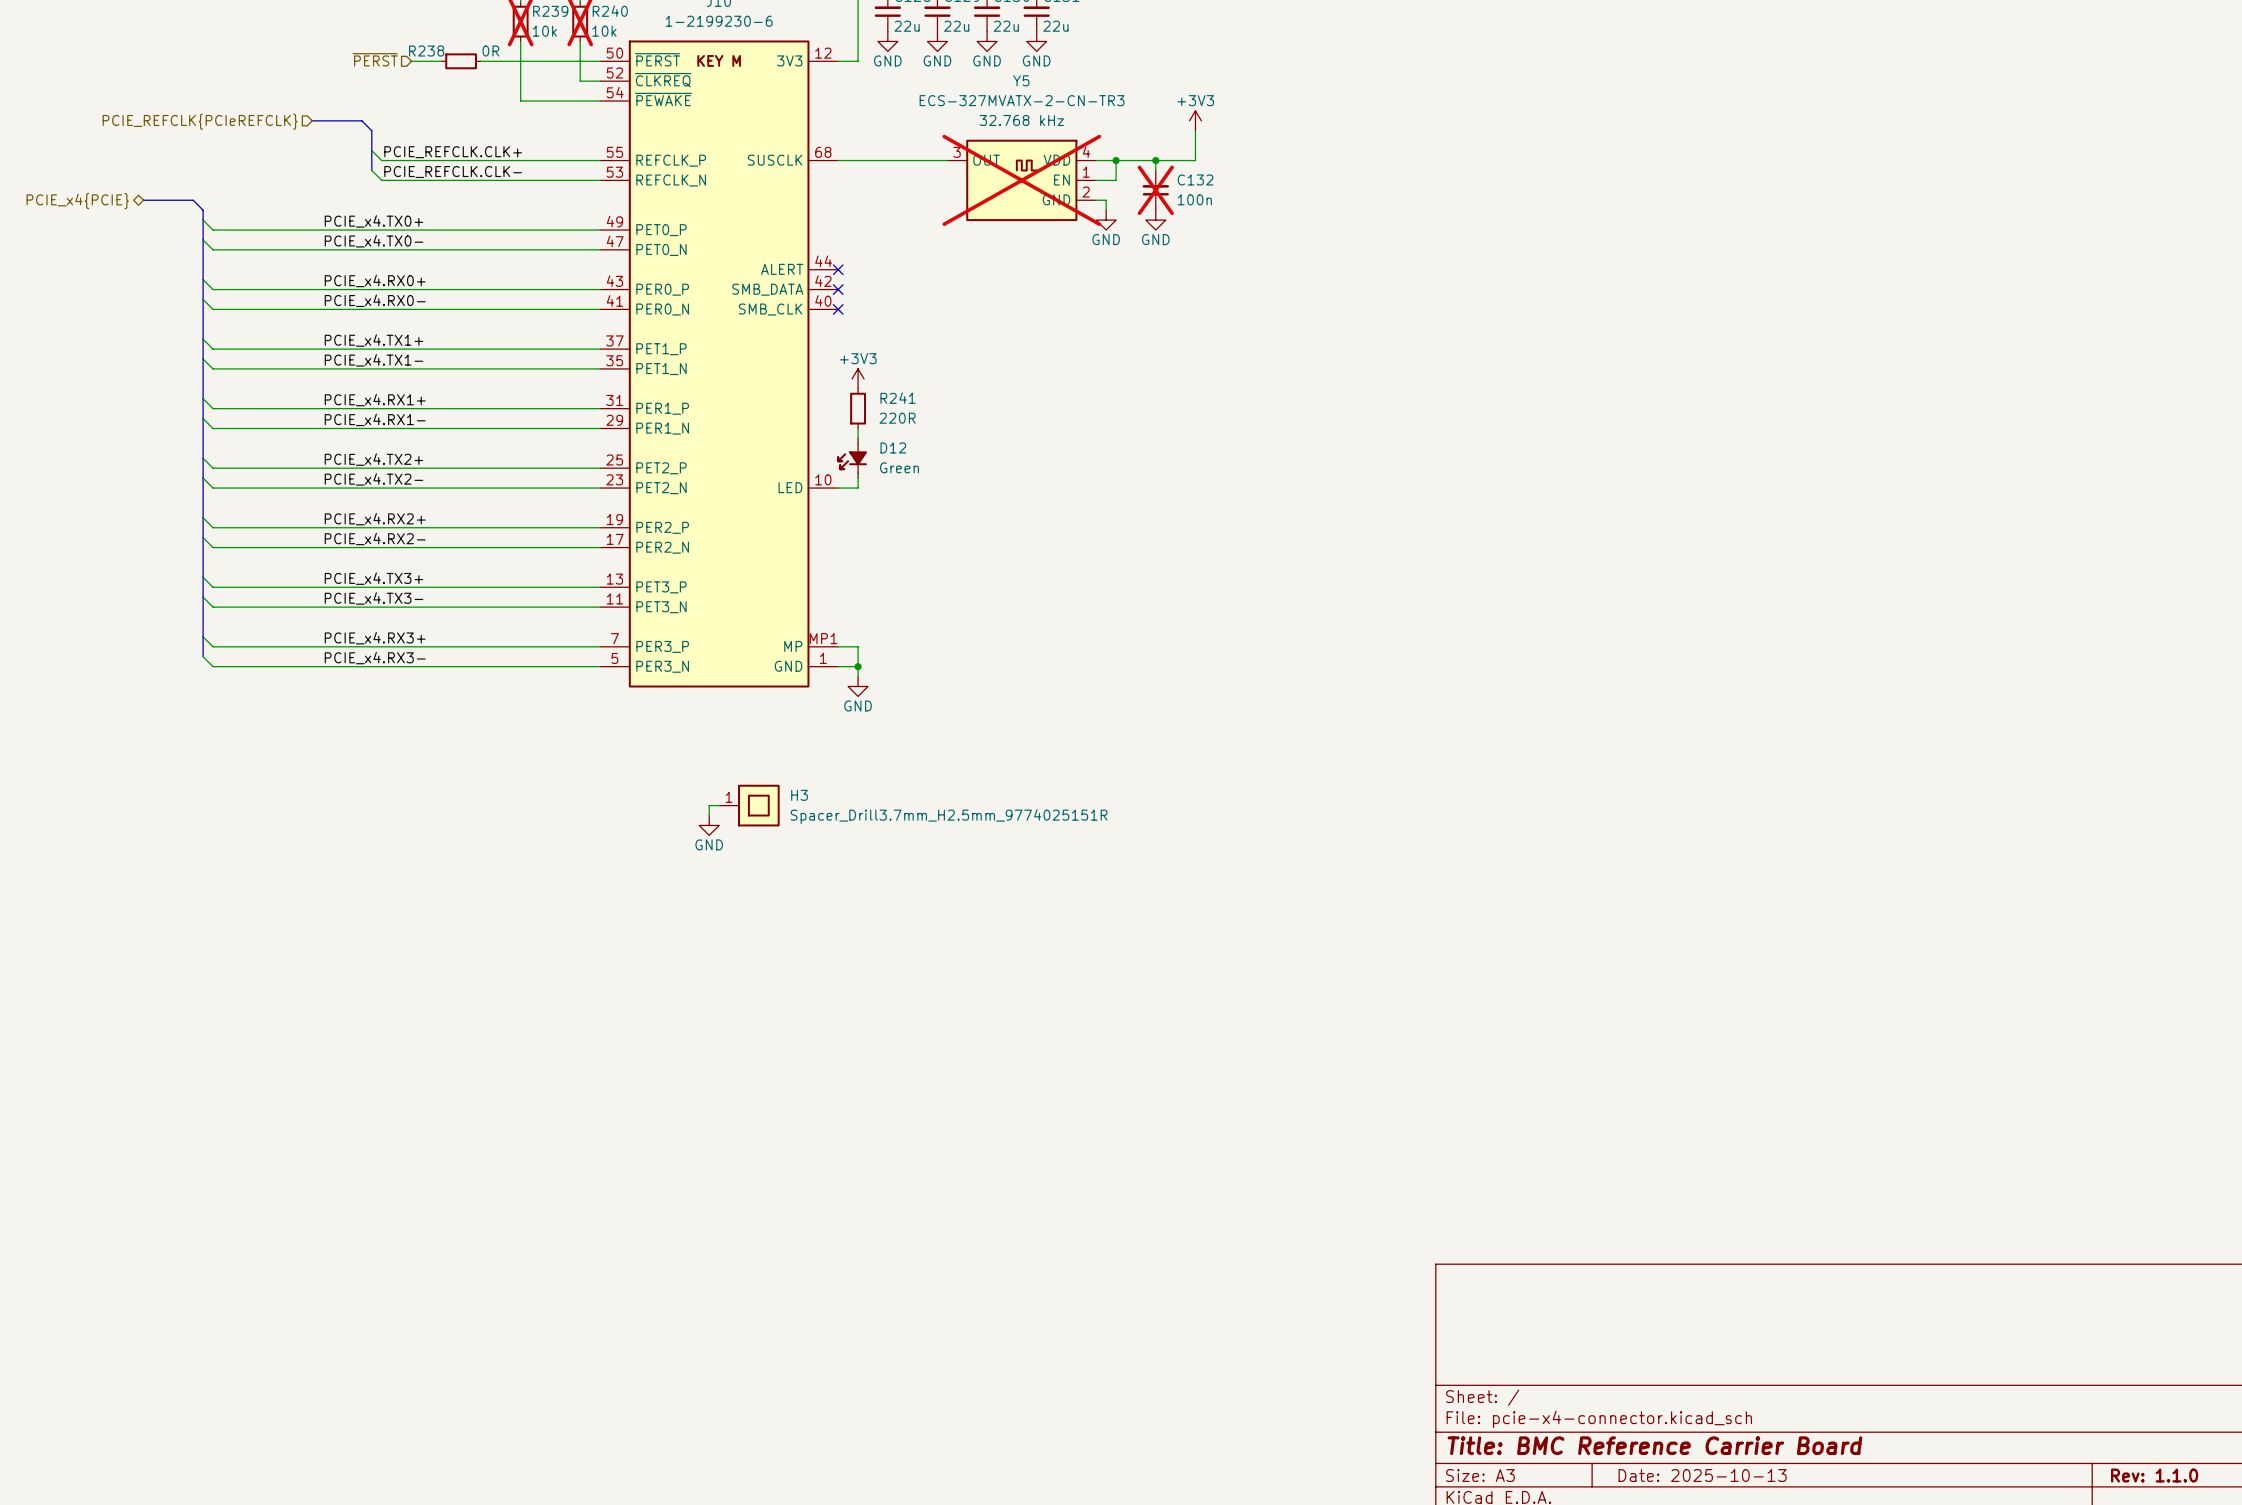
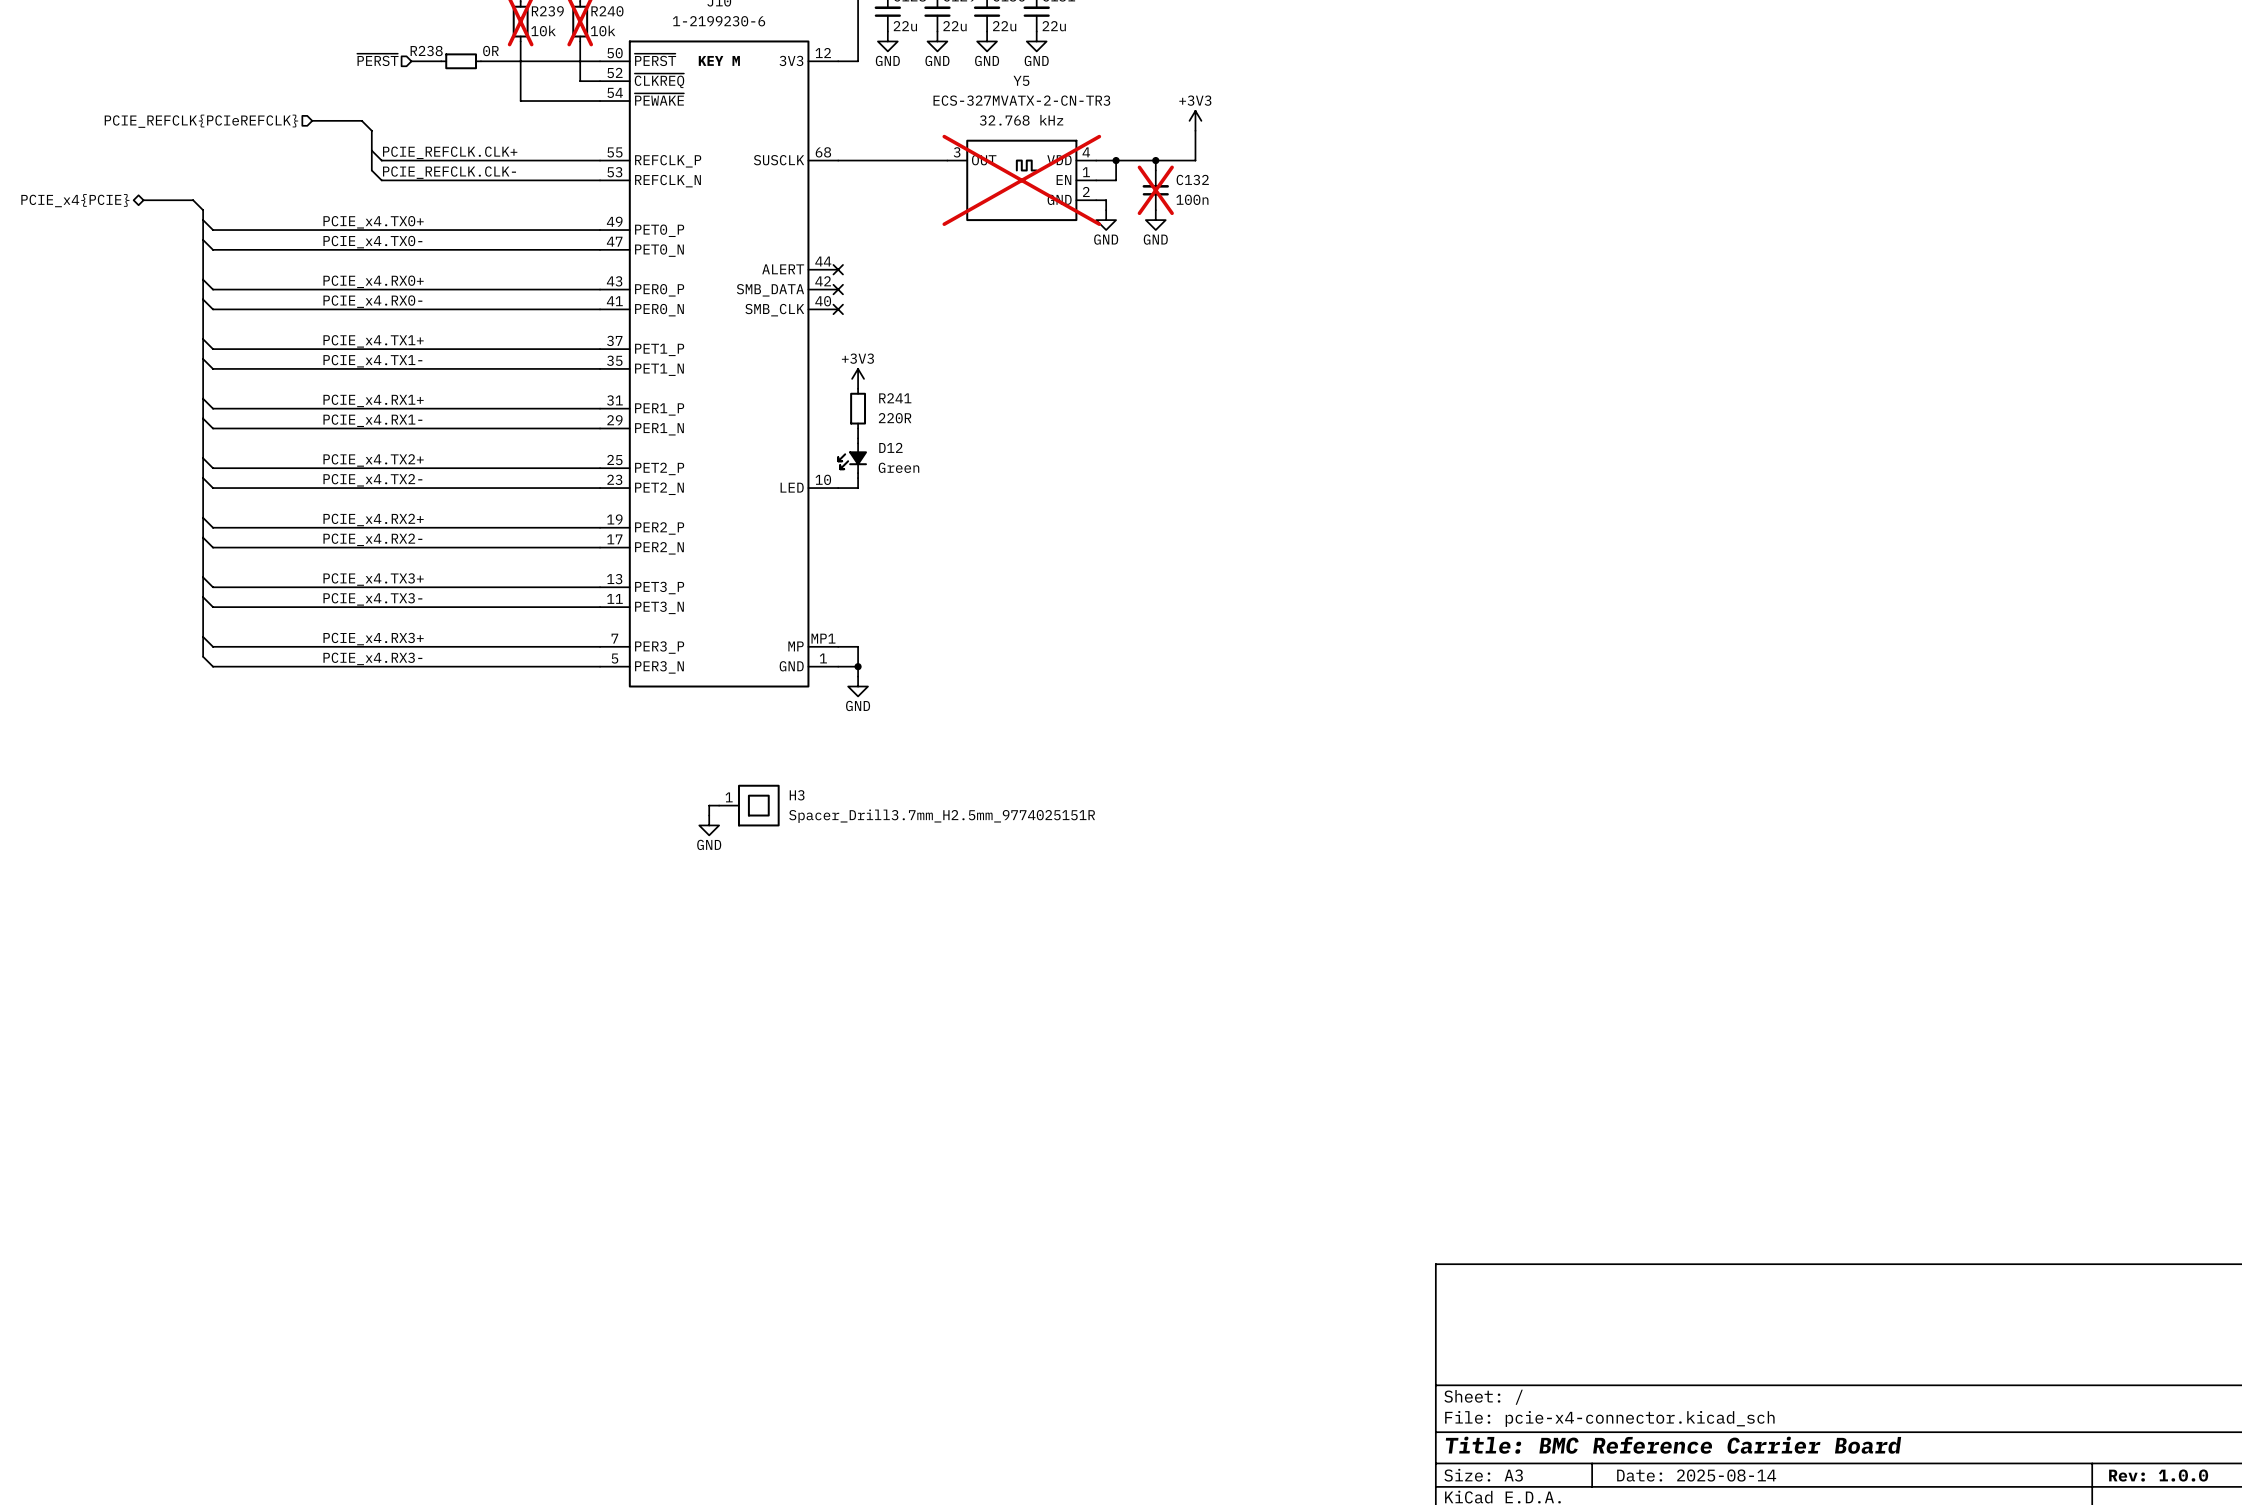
title block: Date: 2025-10-13 (1702, 1475) -> Date: 2025-08-14 (1696, 1475)
title block: Rev: 1.1.0 (2154, 1475) -> Rev: 1.0.0 (2158, 1475)

